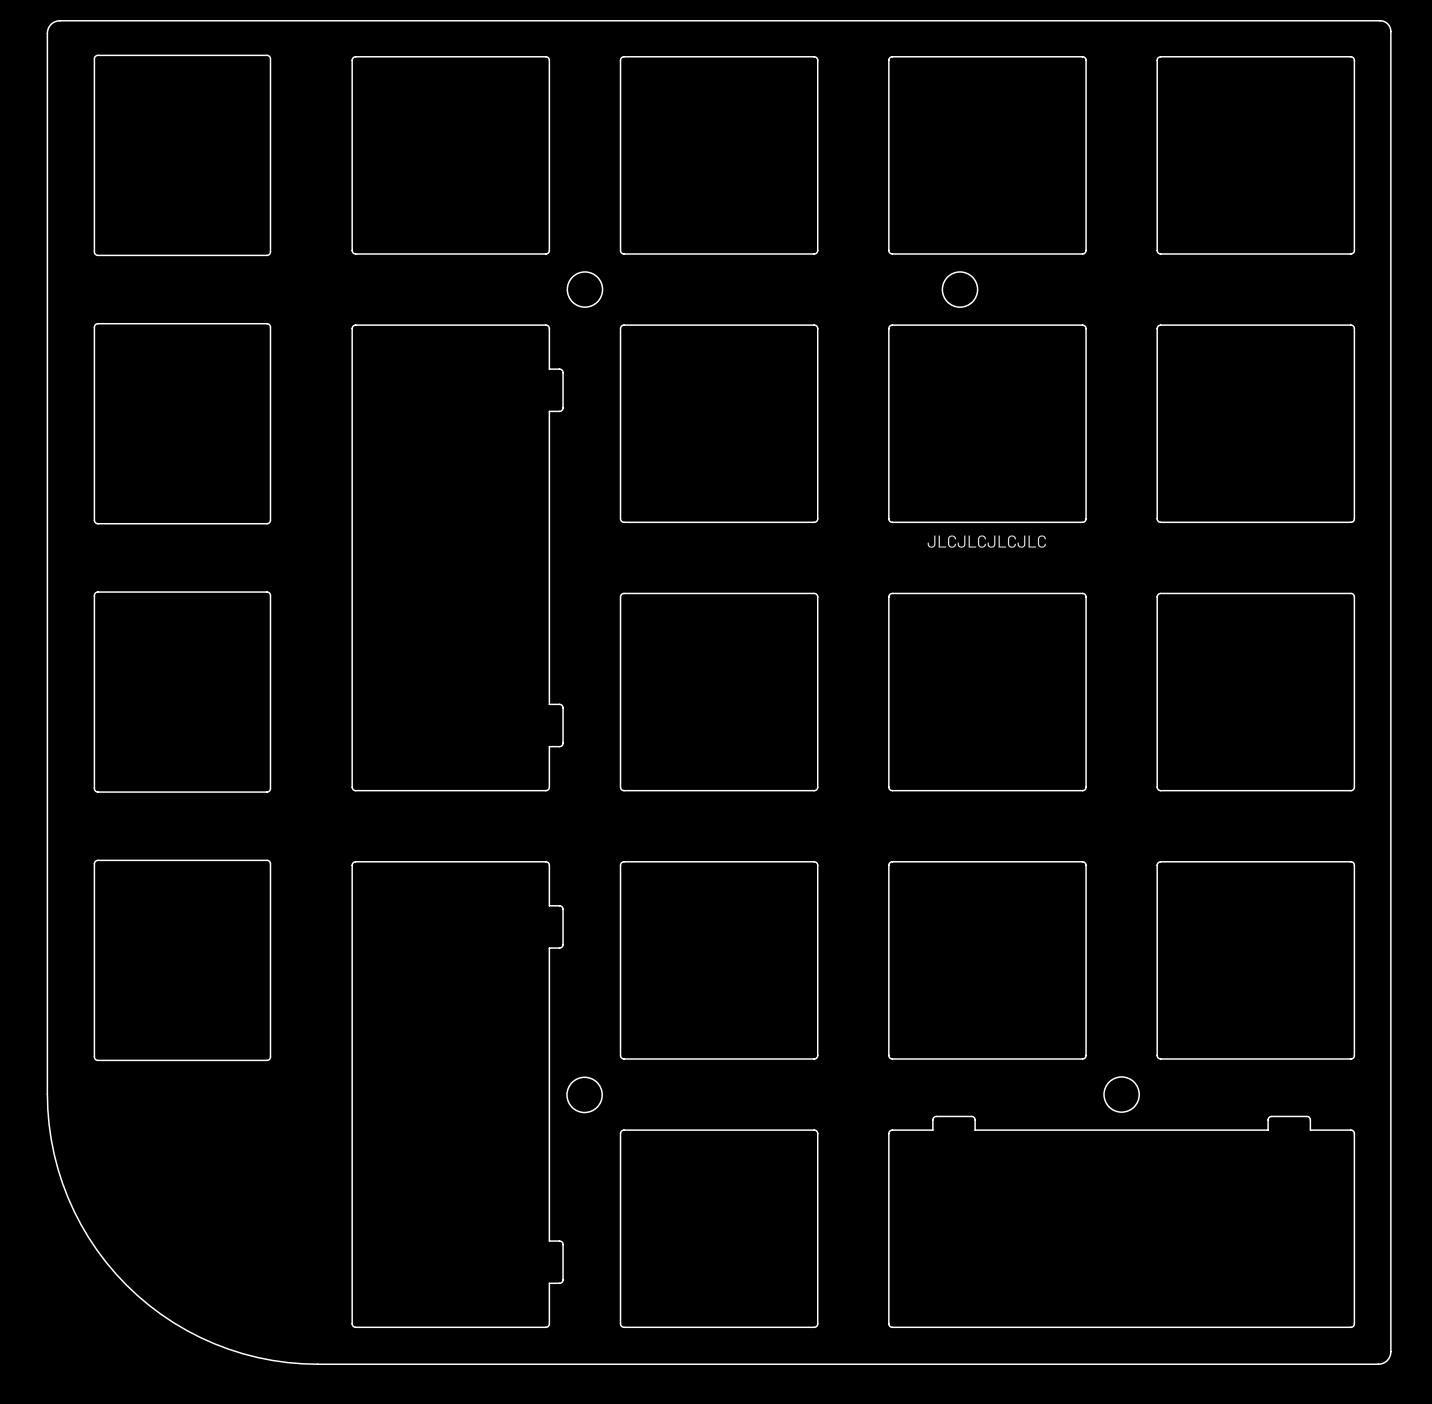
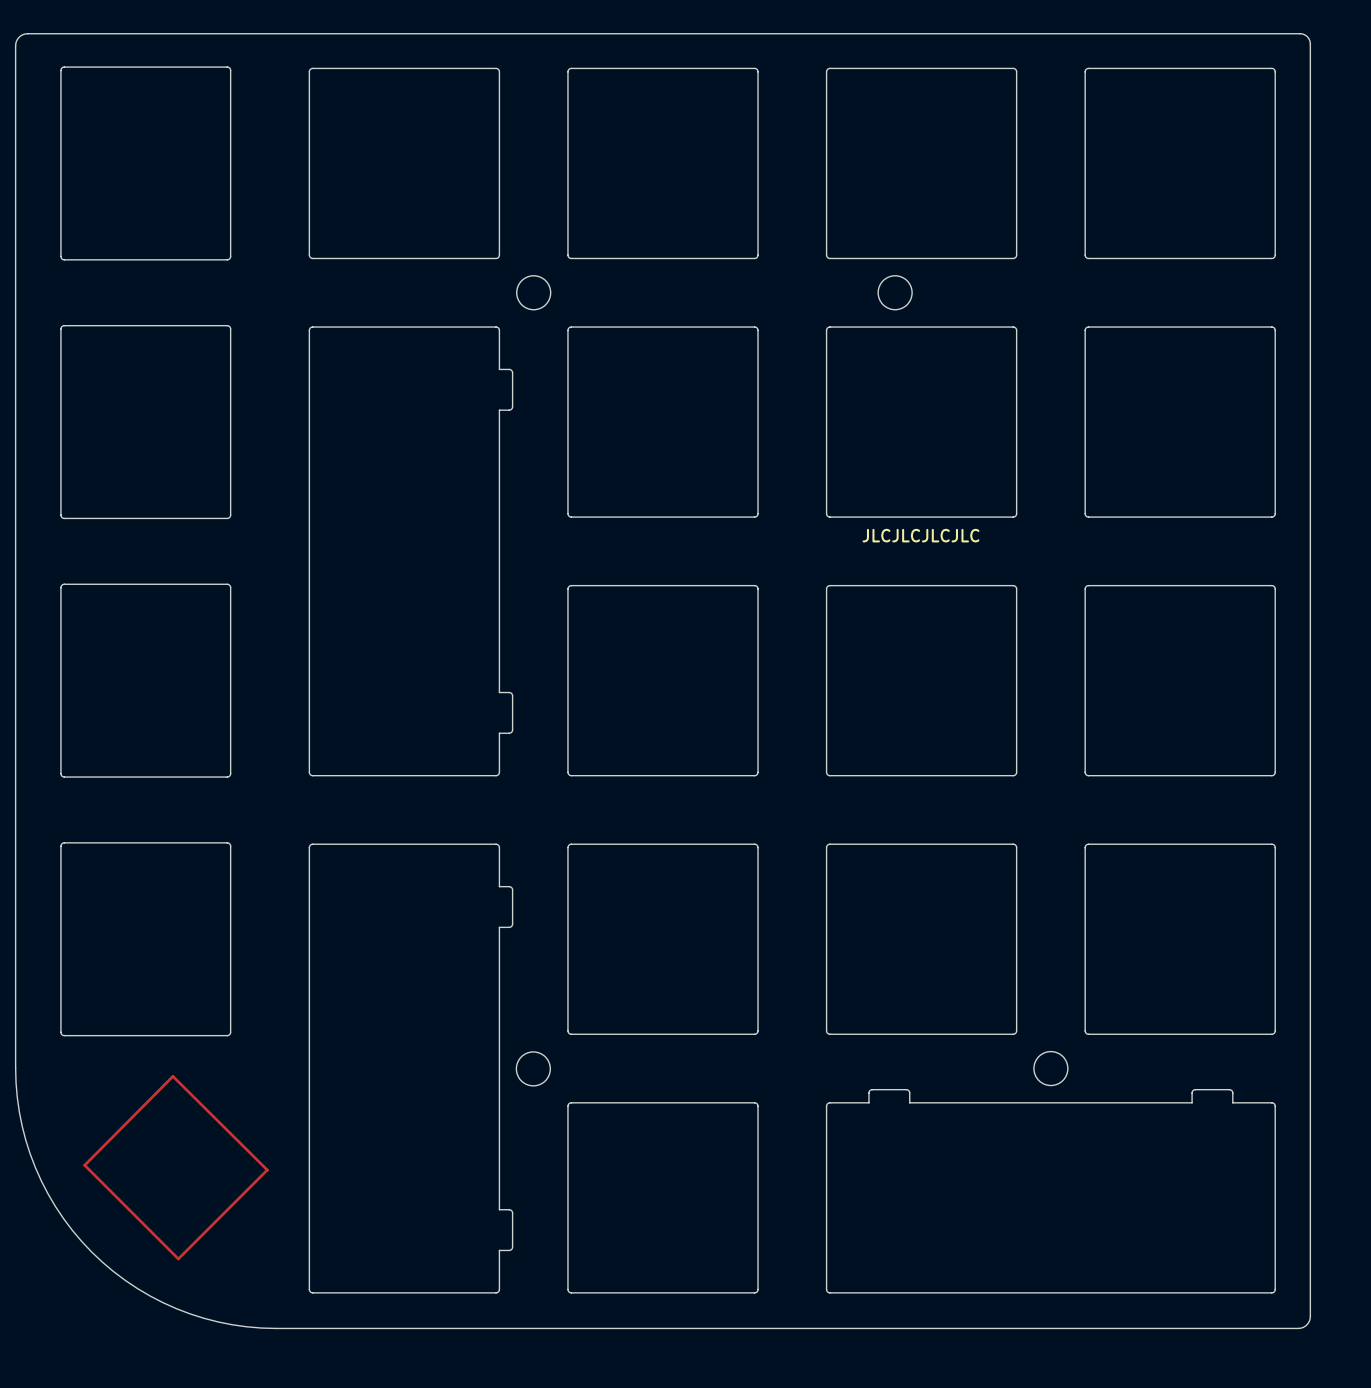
top track: none -> (172, 1076) (84, 1165) (178, 1258) (267, 1170) (172, 1076)

